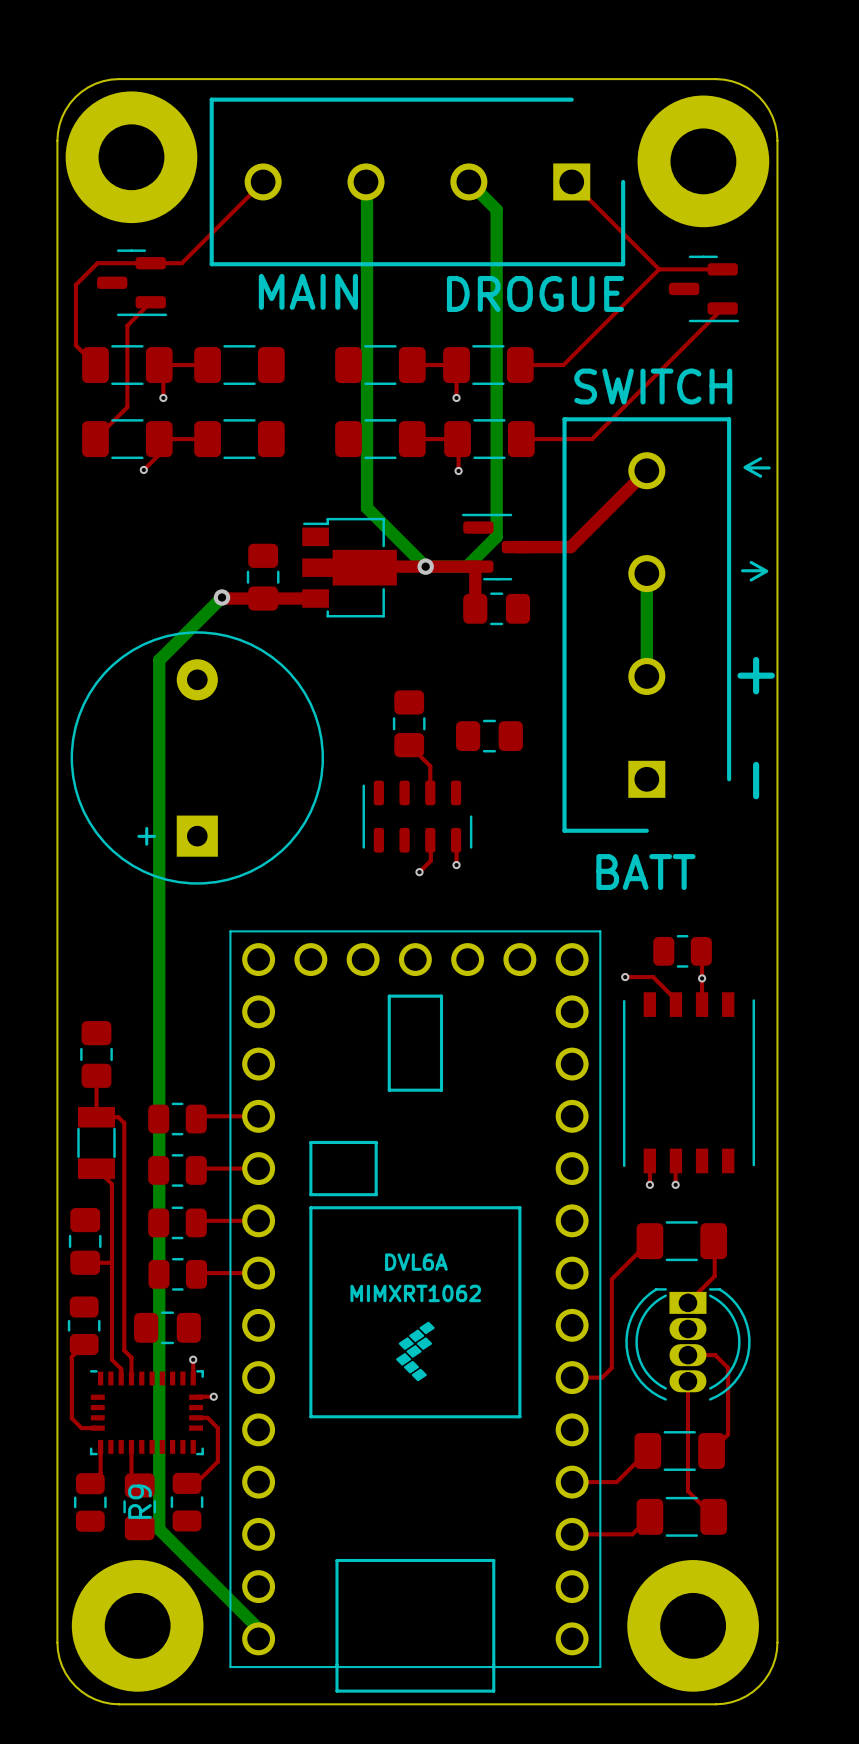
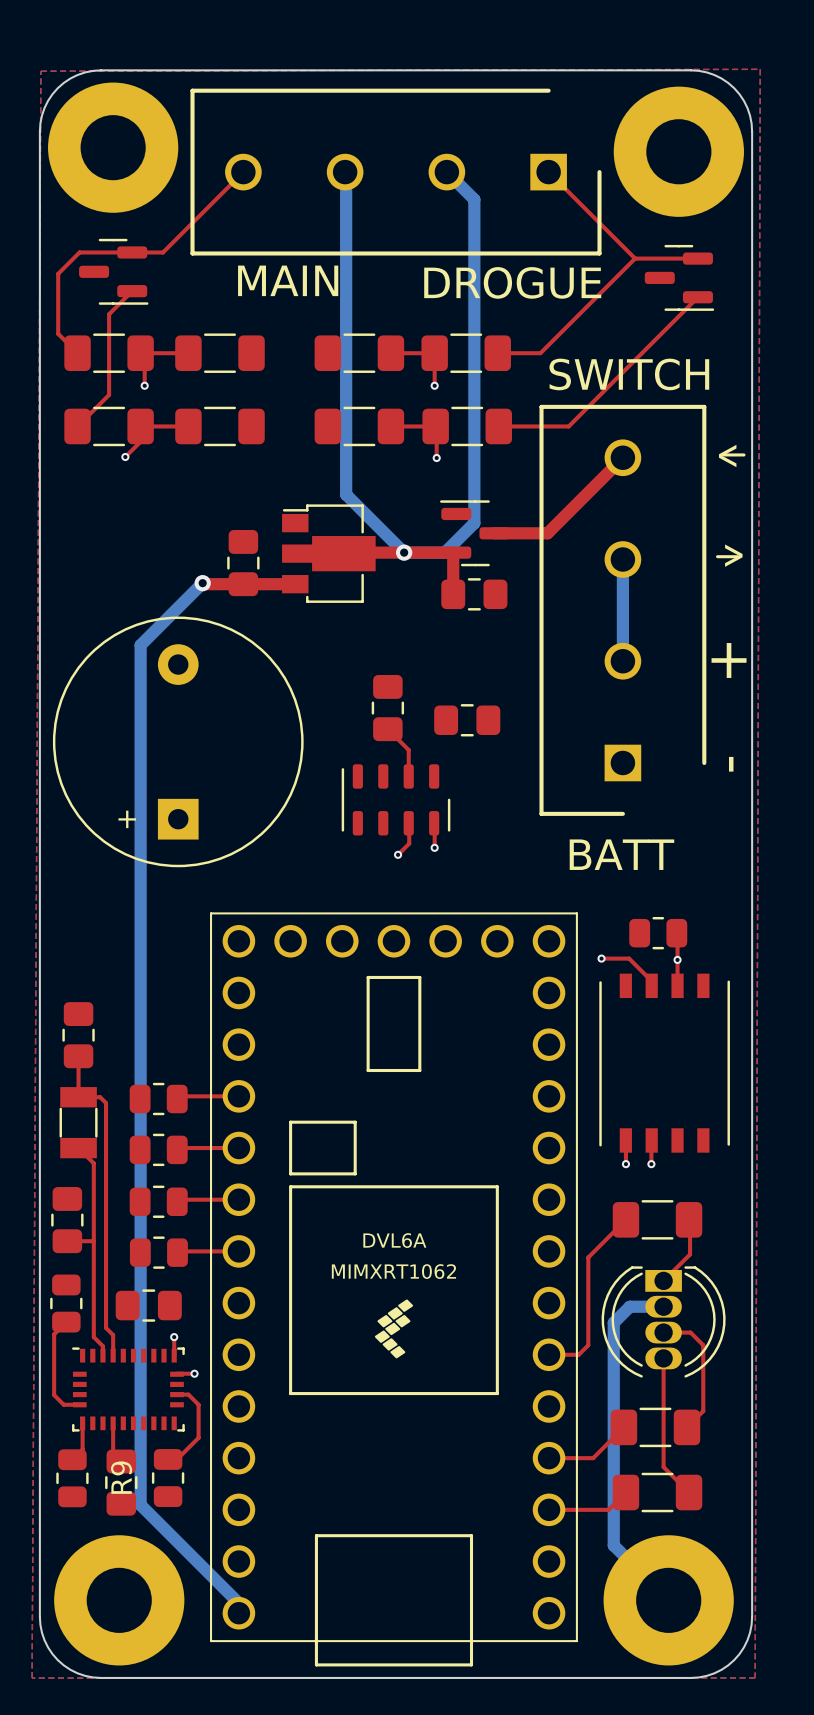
top zone outline: none -> (760, 69) (40, 71) (32, 1678) (755, 1677) (760, 69)
bottom track: none -> (663, 1306) (629, 1306) (613, 1322) (613, 1545) (668, 1600)

